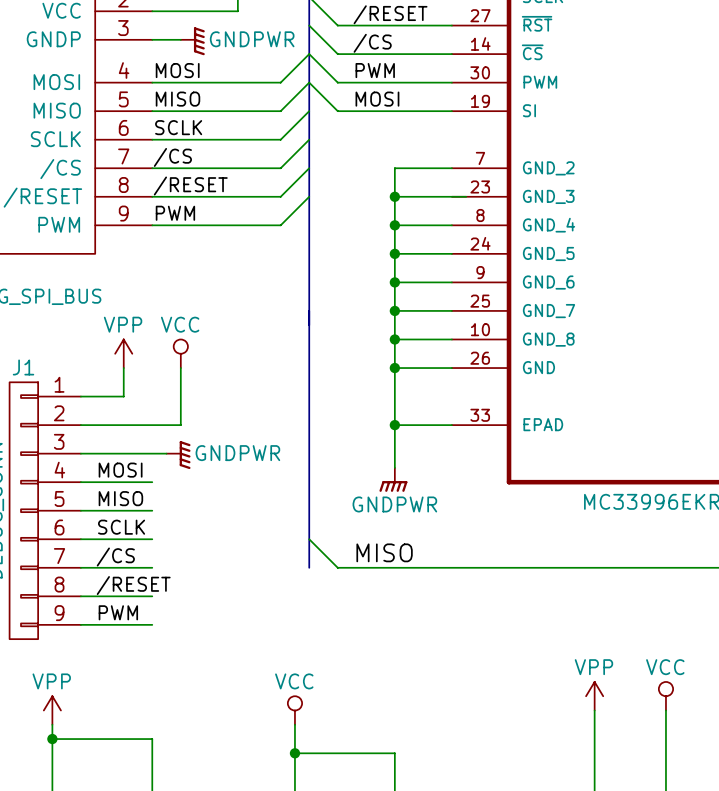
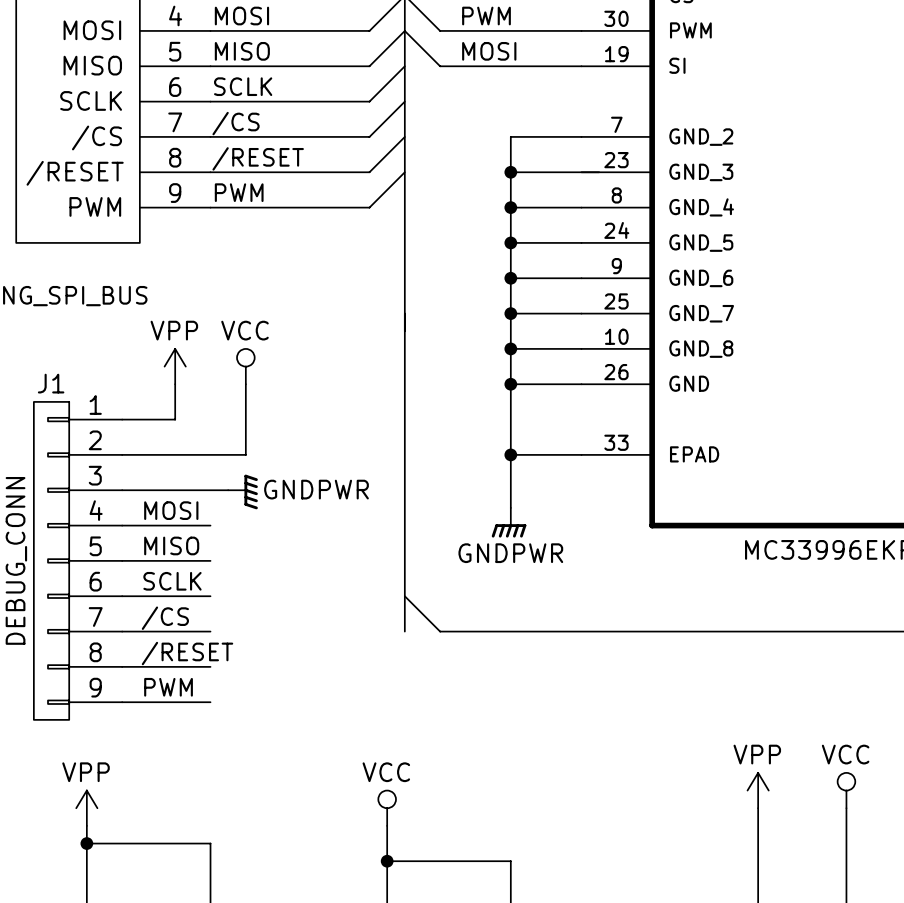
label: MISO (384, 552) -> none

